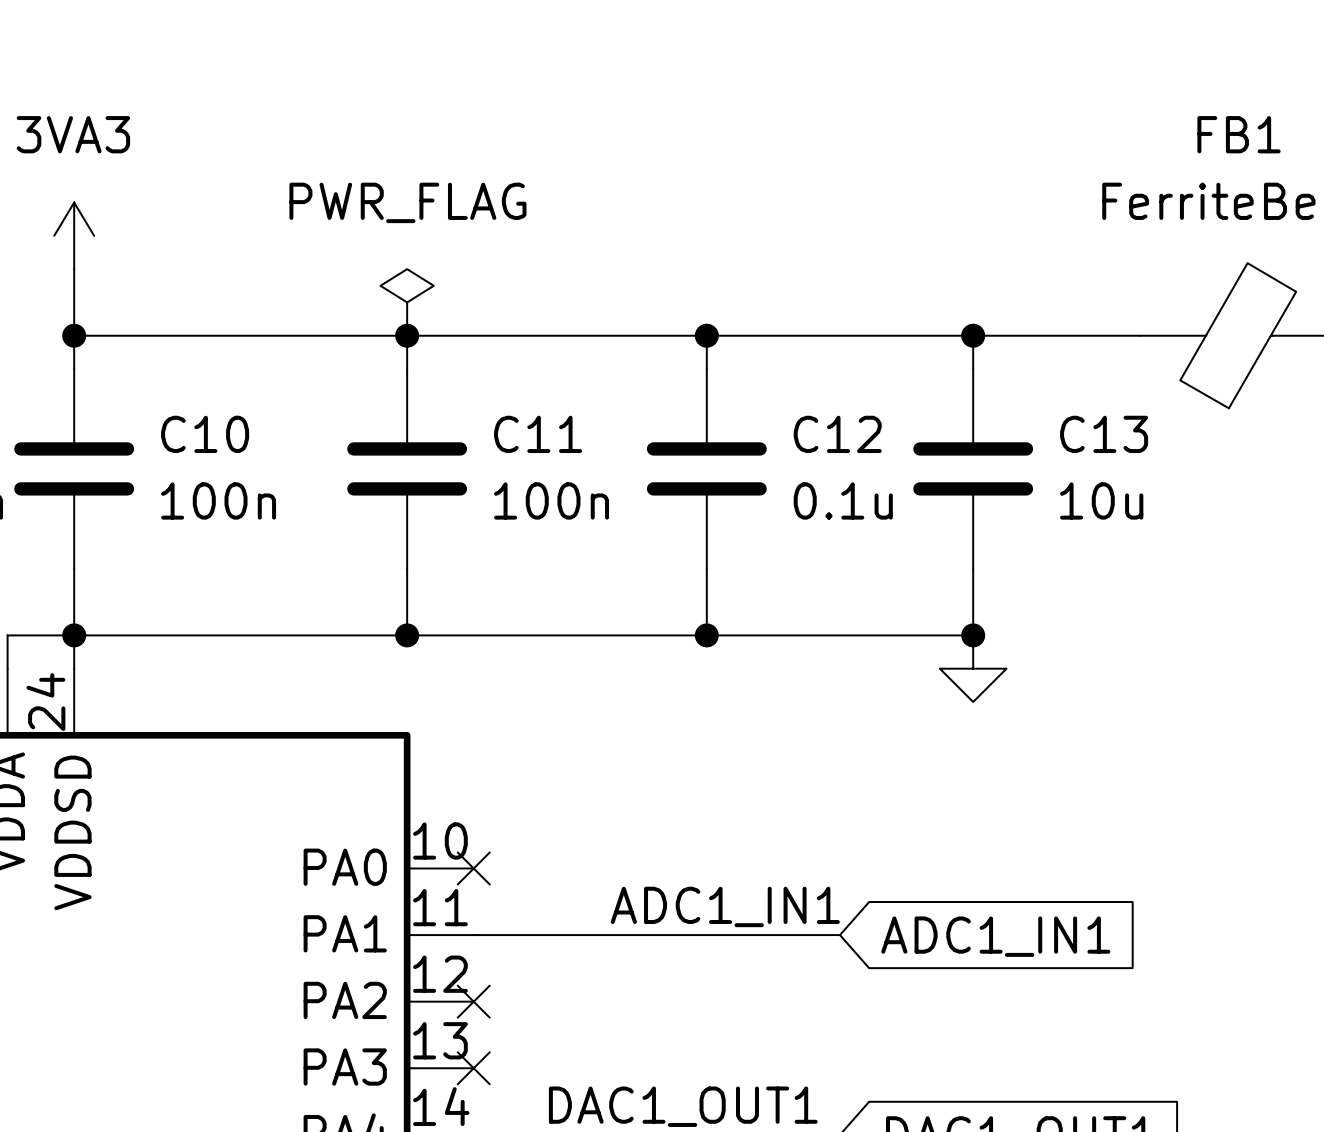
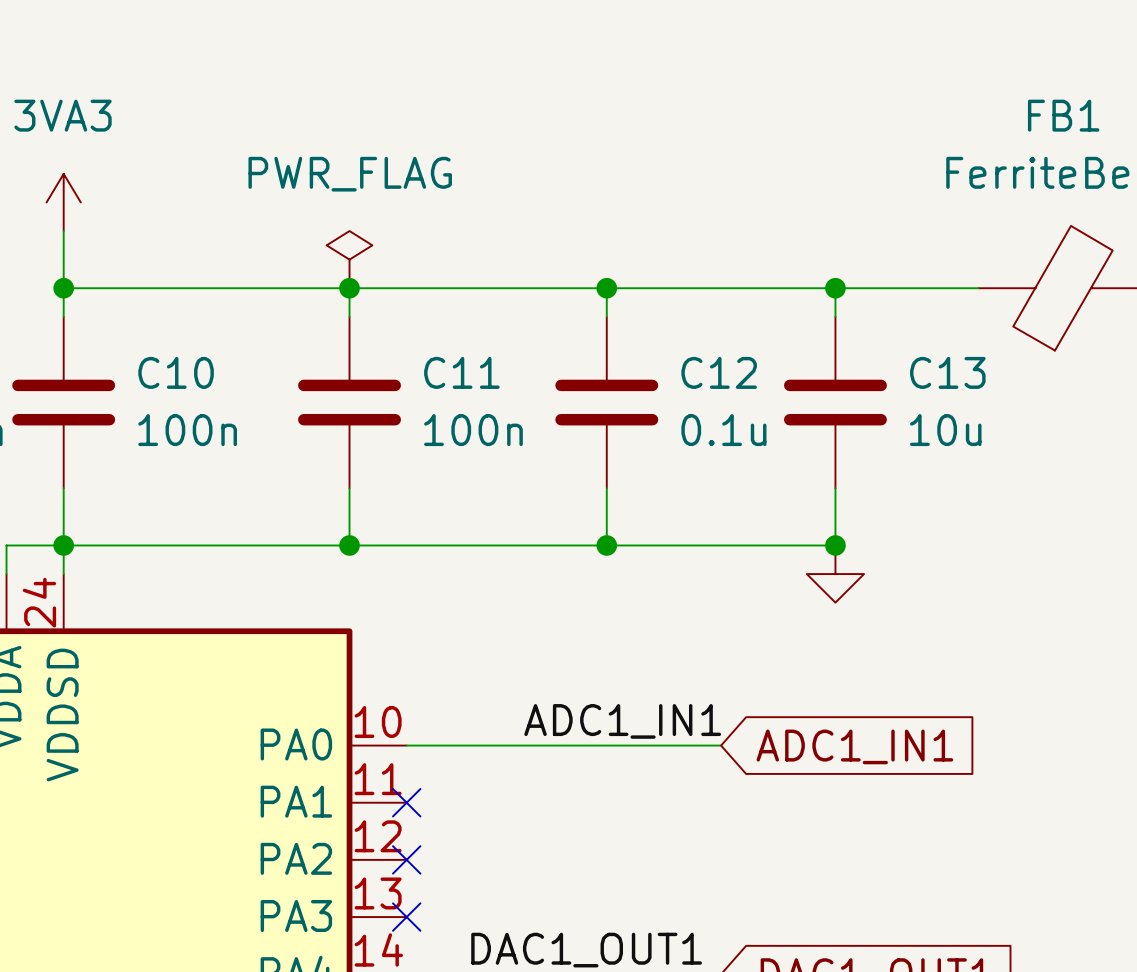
no-connect mark position: (473, 868) -> (406, 802)
label position: ADC1_IN1 (725, 906) -> ADC1_IN1 (622, 721)
wire: (473, 935) (840, 935) -> (406, 745) (721, 745)
global label position: ADC1_IN1 (995, 936) -> ADC1_IN1 (854, 746)

